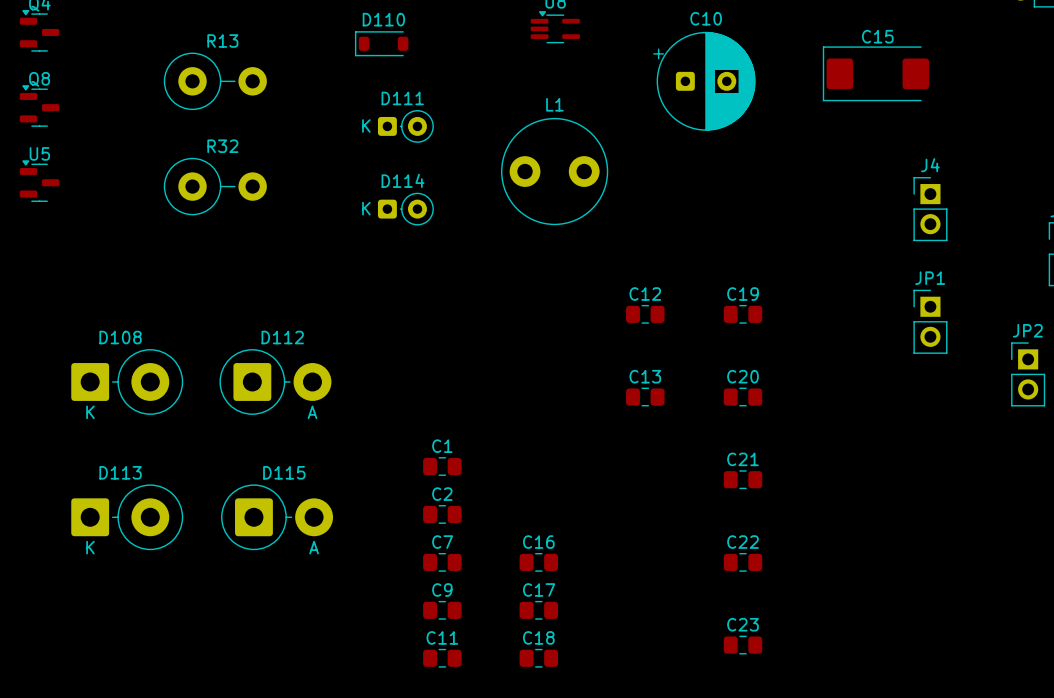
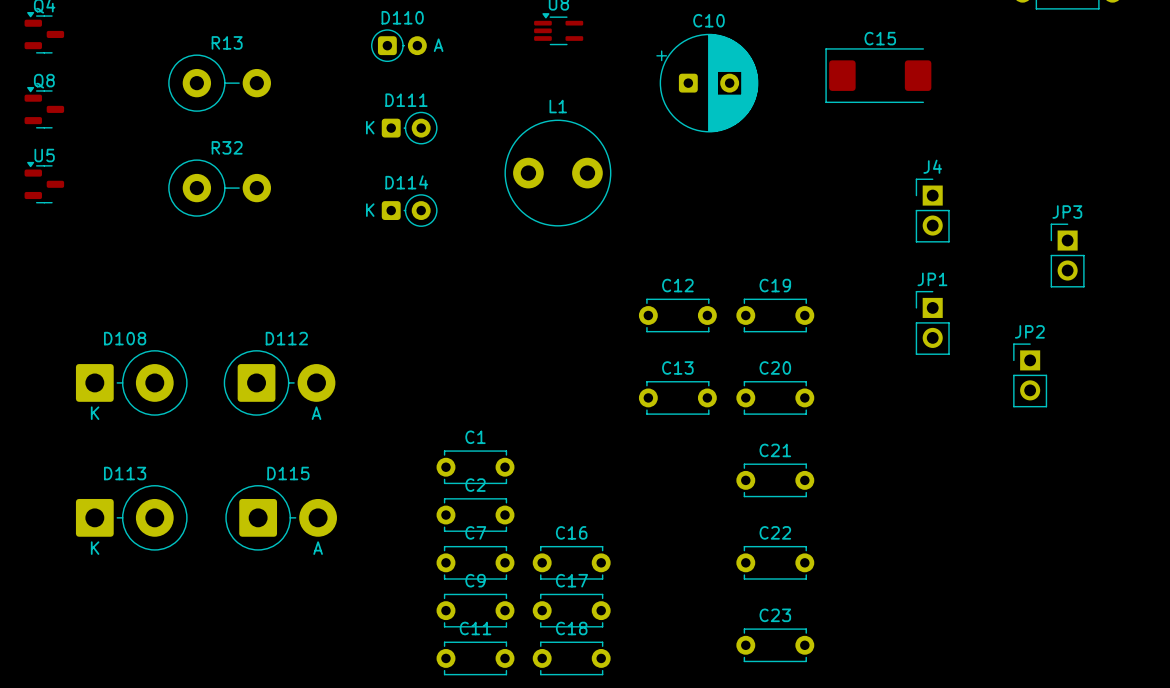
D110 footprint: [354, 31, 409, 57] -> [371, 29, 427, 63]
C12 footprint: [626, 304, 665, 324] -> [638, 298, 717, 333]
C19 footprint: [723, 304, 763, 324] -> [736, 298, 815, 333]
C13 footprint: [626, 387, 665, 407] -> [638, 381, 717, 415]
C20 footprint: [723, 387, 763, 407] -> [736, 381, 815, 415]
C1 footprint: [423, 457, 462, 476] -> [436, 450, 515, 485]
C21 footprint: [723, 470, 763, 490] -> [736, 463, 815, 498]
C2 footprint: [423, 505, 462, 524] -> [436, 498, 515, 532]
C7 footprint: [423, 552, 462, 572] -> [436, 545, 515, 580]
C16 footprint: [519, 552, 559, 572] -> [532, 545, 611, 580]
C22 footprint: [723, 552, 763, 572] -> [736, 545, 815, 580]
C9 footprint: [423, 600, 462, 620] -> [436, 593, 515, 628]
C17 footprint: [519, 600, 559, 620] -> [532, 593, 611, 628]
C23 footprint: [723, 635, 763, 655] -> [736, 628, 815, 663]
C11 footprint: [423, 648, 462, 668] -> [436, 641, 515, 676]
C18 footprint: [519, 648, 559, 668] -> [532, 641, 611, 676]

